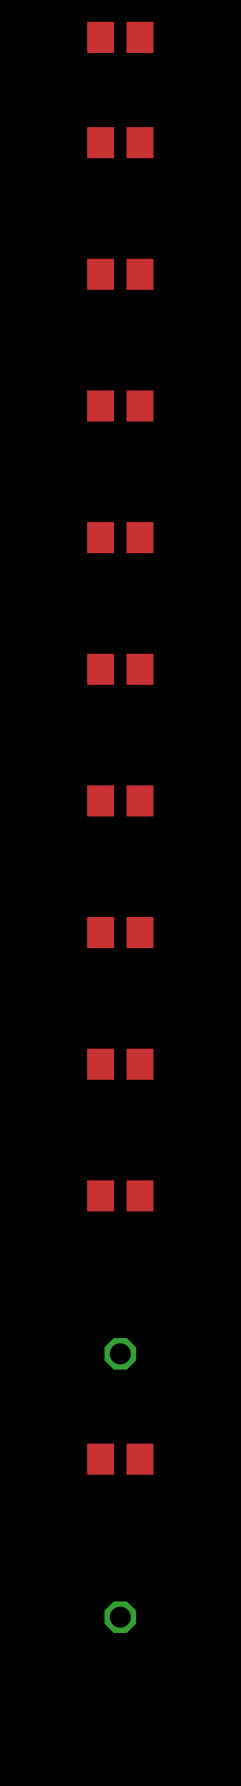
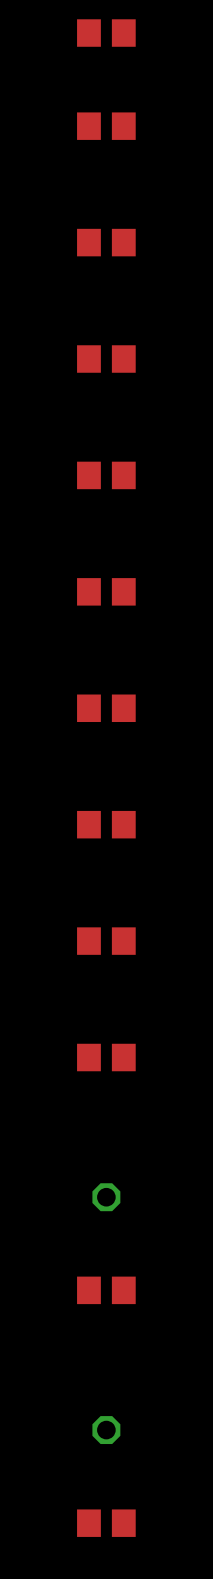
part: none -> (106, 1523)

